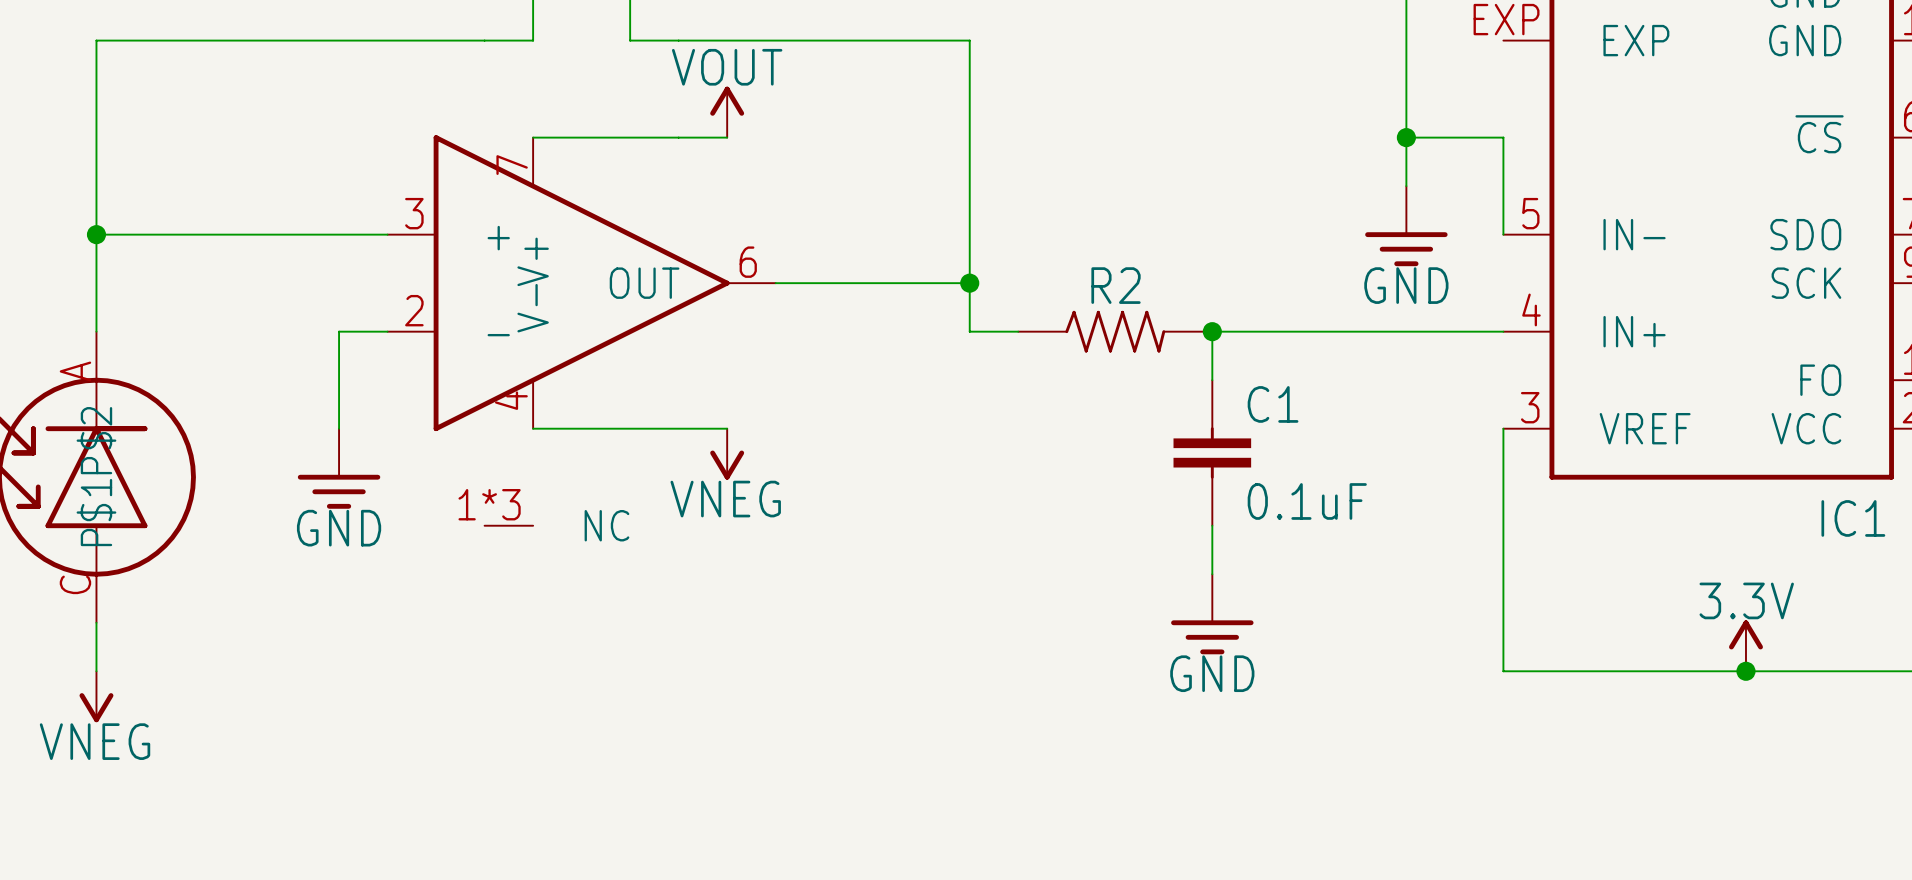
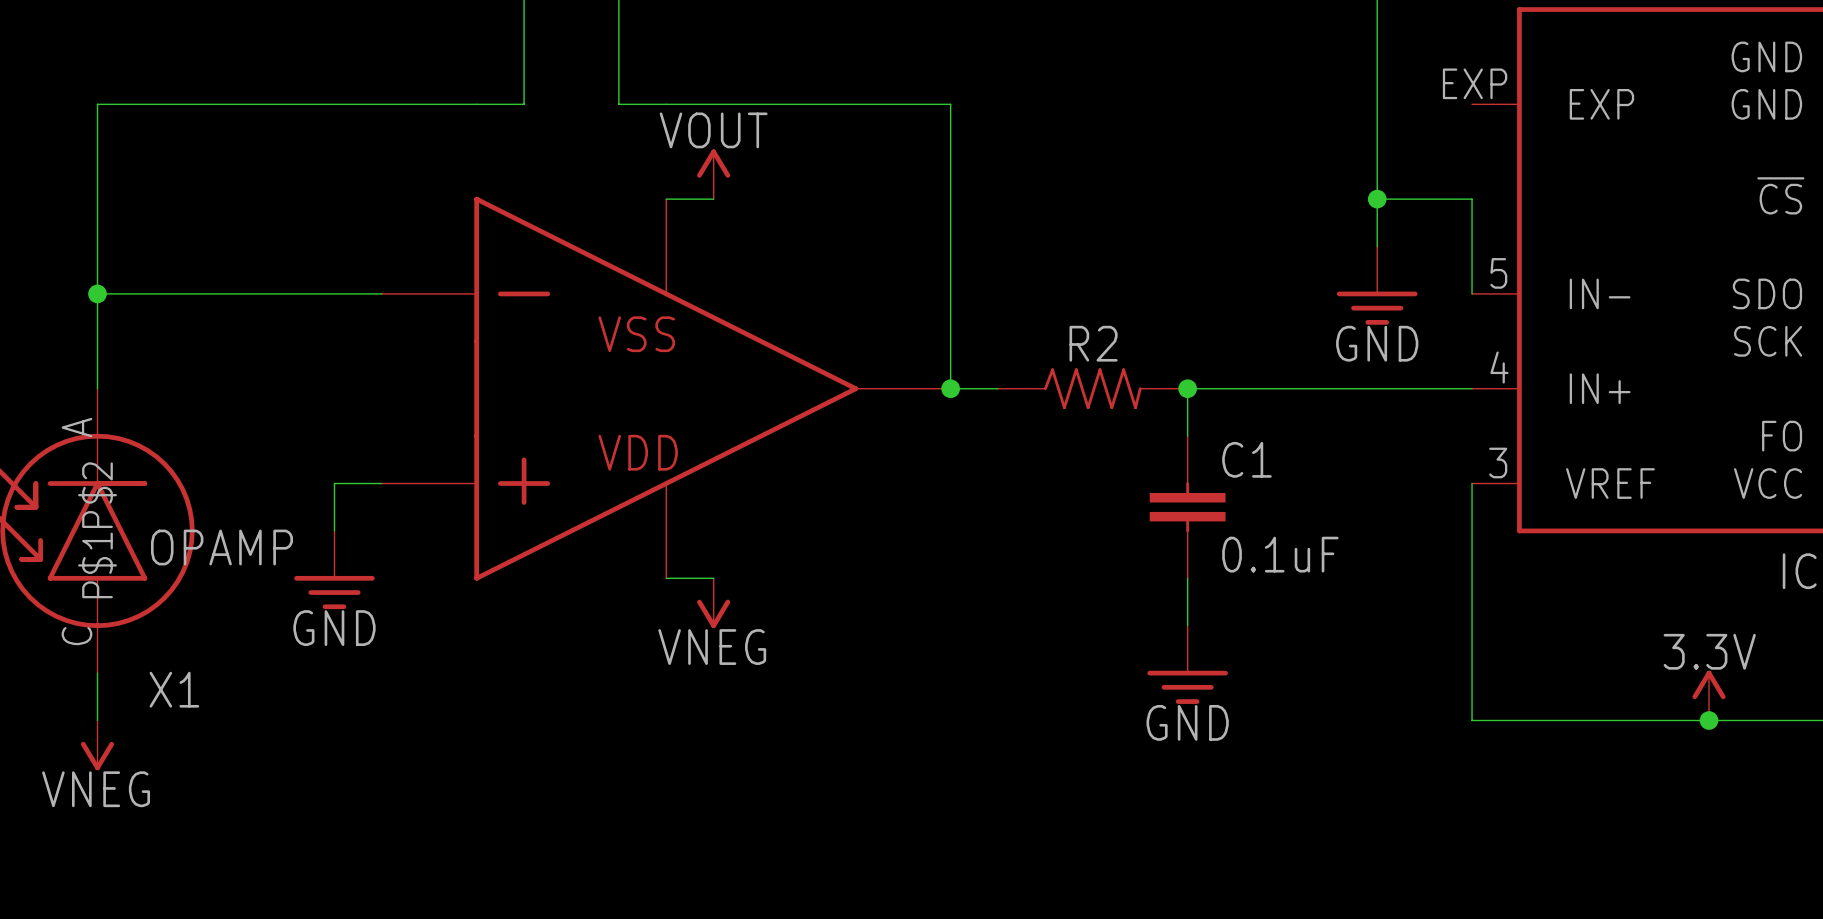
wire: (533, 137) (678, 137) -> none
wire: (775, 283) (969, 283) -> none
junction position: (969, 283) -> (950, 388)
part: (581, 330) -> none
wire: (387, 331) (339, 331) (339, 428) -> none
X1: none -> OPAMP (666, 388)
wire: none -> (381, 483) (334, 483) (334, 530)
wire: (533, 428) (727, 428) -> none
power symbol position: VNEG (727, 454) -> VNEG (713, 603)
power symbol position: GND (339, 468) -> GND (334, 570)
wire: none -> (666, 578) (713, 578)

